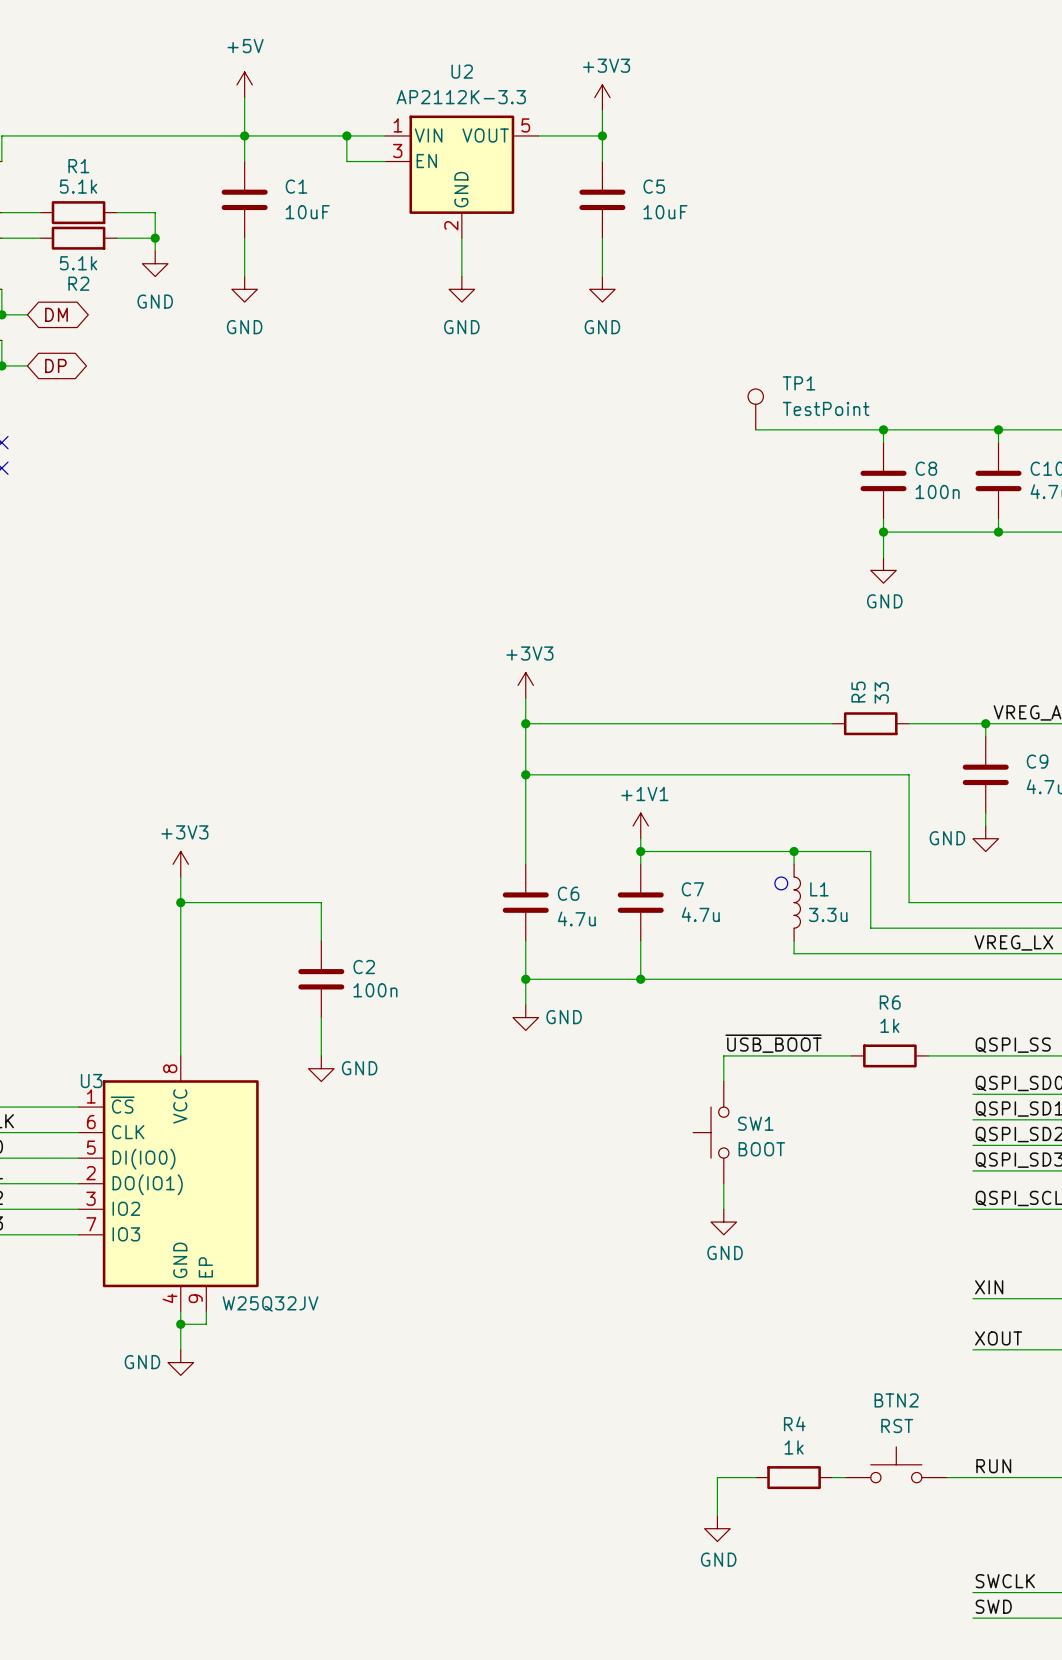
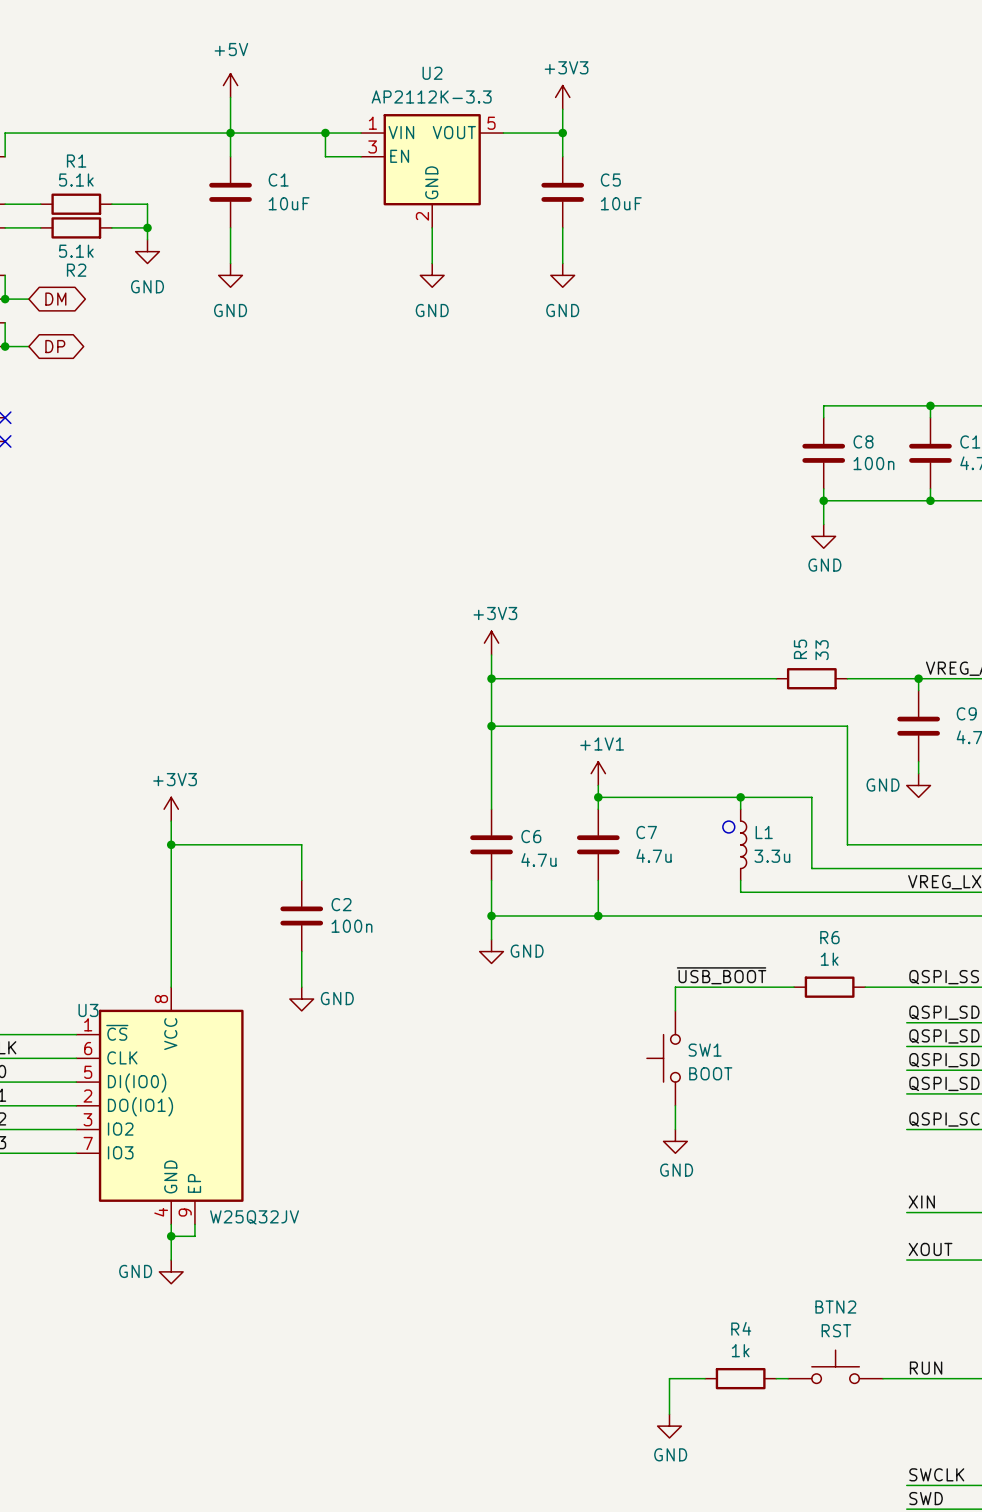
TP1: TestPoint (755, 409) -> none
wire: (755, 429) (883, 429) -> none
junction: (883, 429) -> none

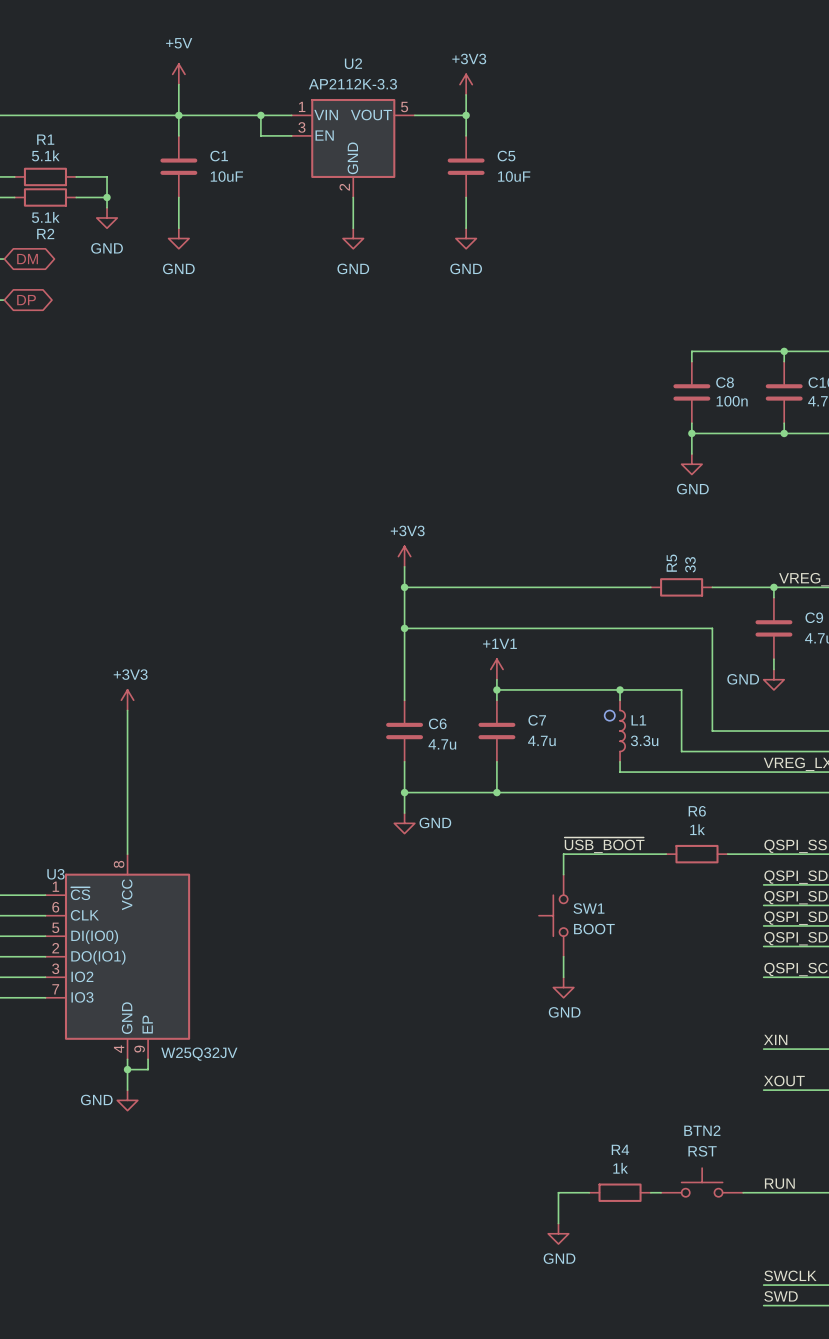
wire: (171, 844) (301, 844) (301, 880) -> none
junction: (171, 844) -> none
C2: 100n (301, 915) -> none
wire: (301, 951) (301, 987) -> none
power symbol: GND (301, 999) -> none

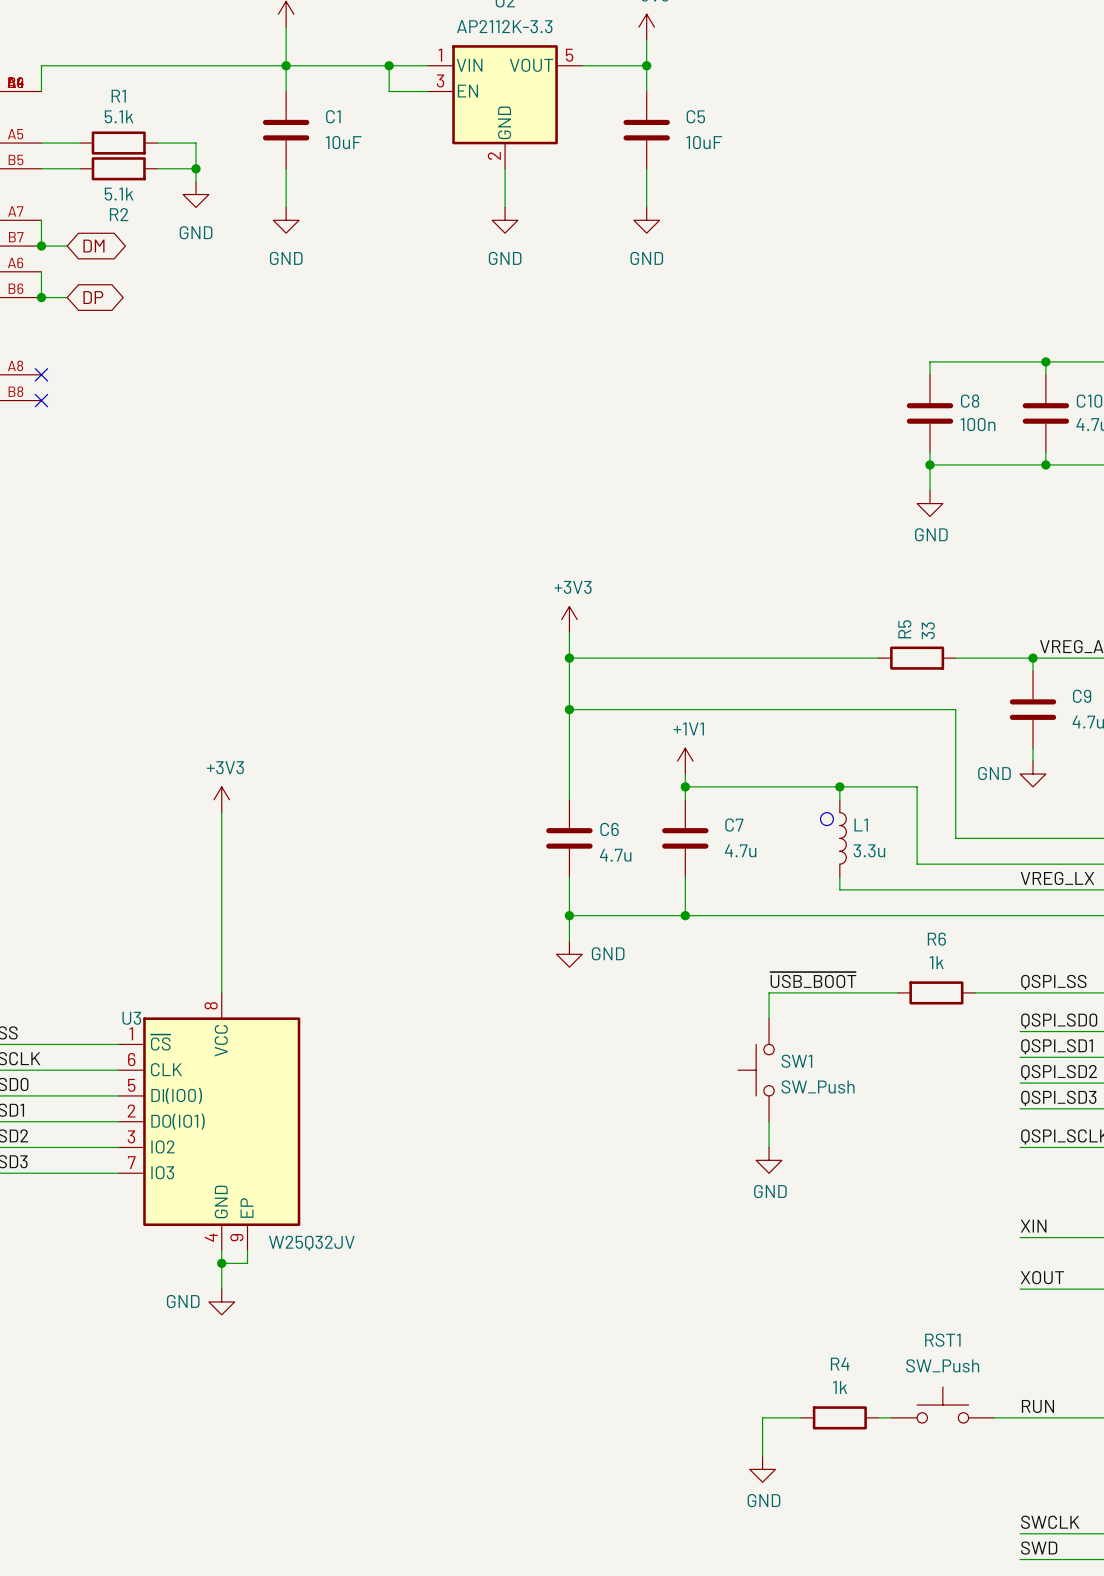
SW1 value: BOOT (594, 929) -> SW_Push (818, 1086)
BTN2 name: BTN2 (702, 1130) -> RST1 (942, 1340)
BTN2 value: RST (702, 1151) -> SW_Push (942, 1365)

